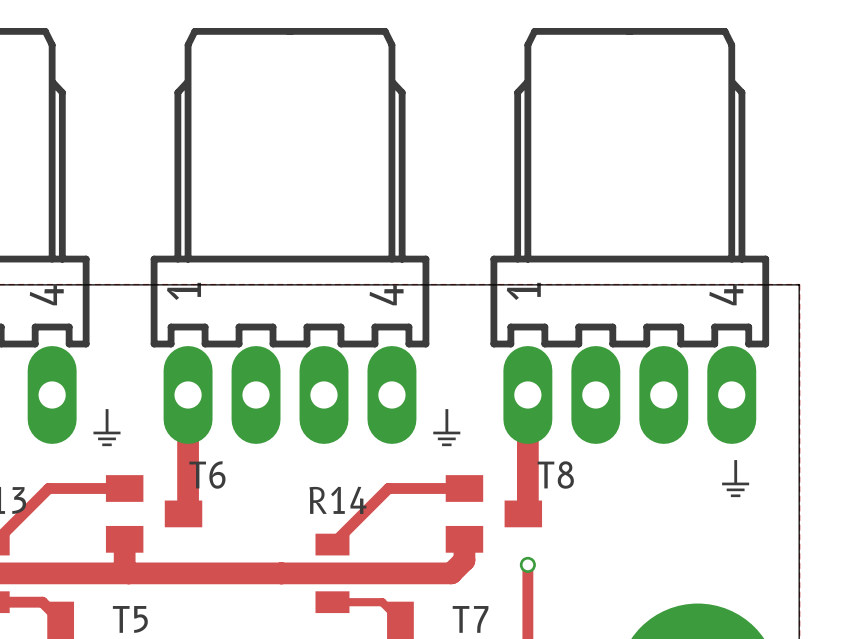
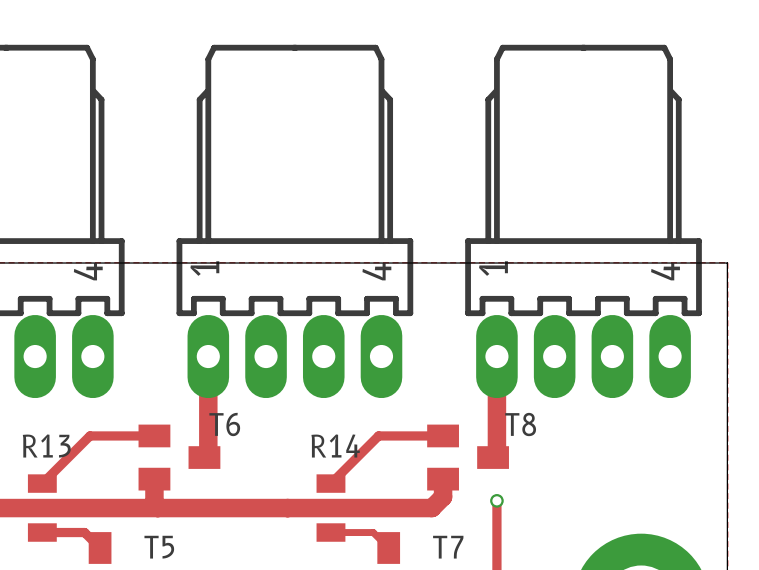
text: ⏚ (106, 427) -> none
text: ⏚ (446, 427) -> none
text: ⏚ (735, 478) -> none

